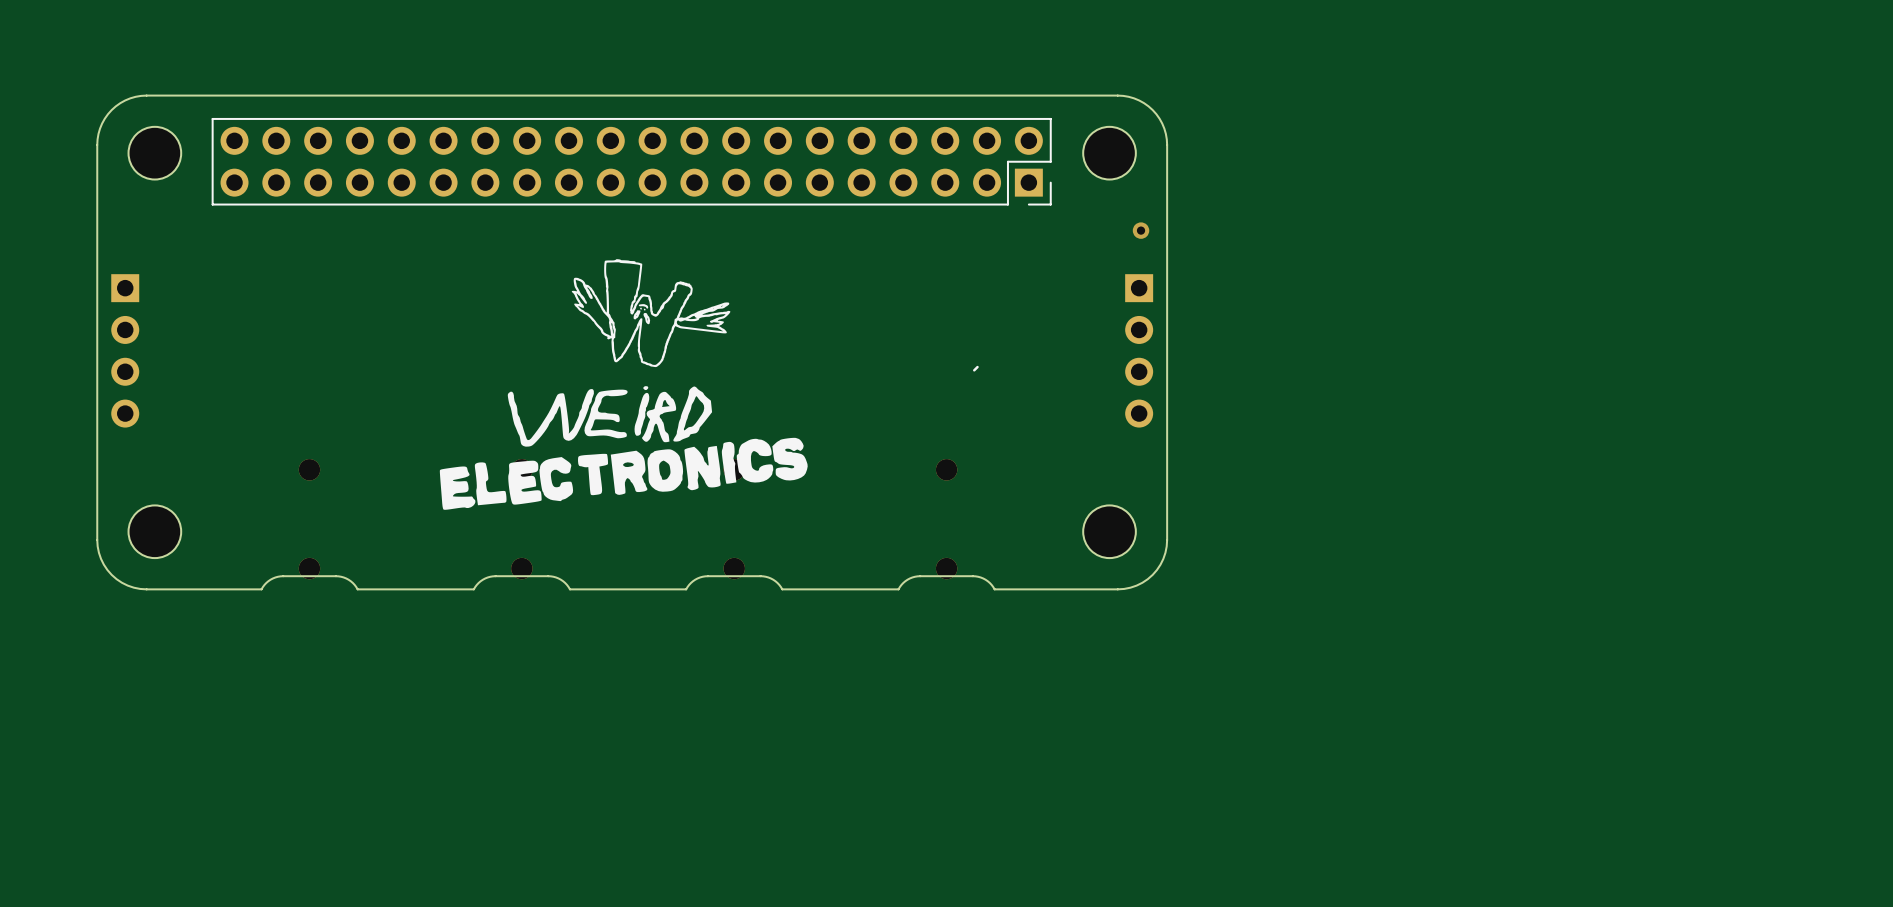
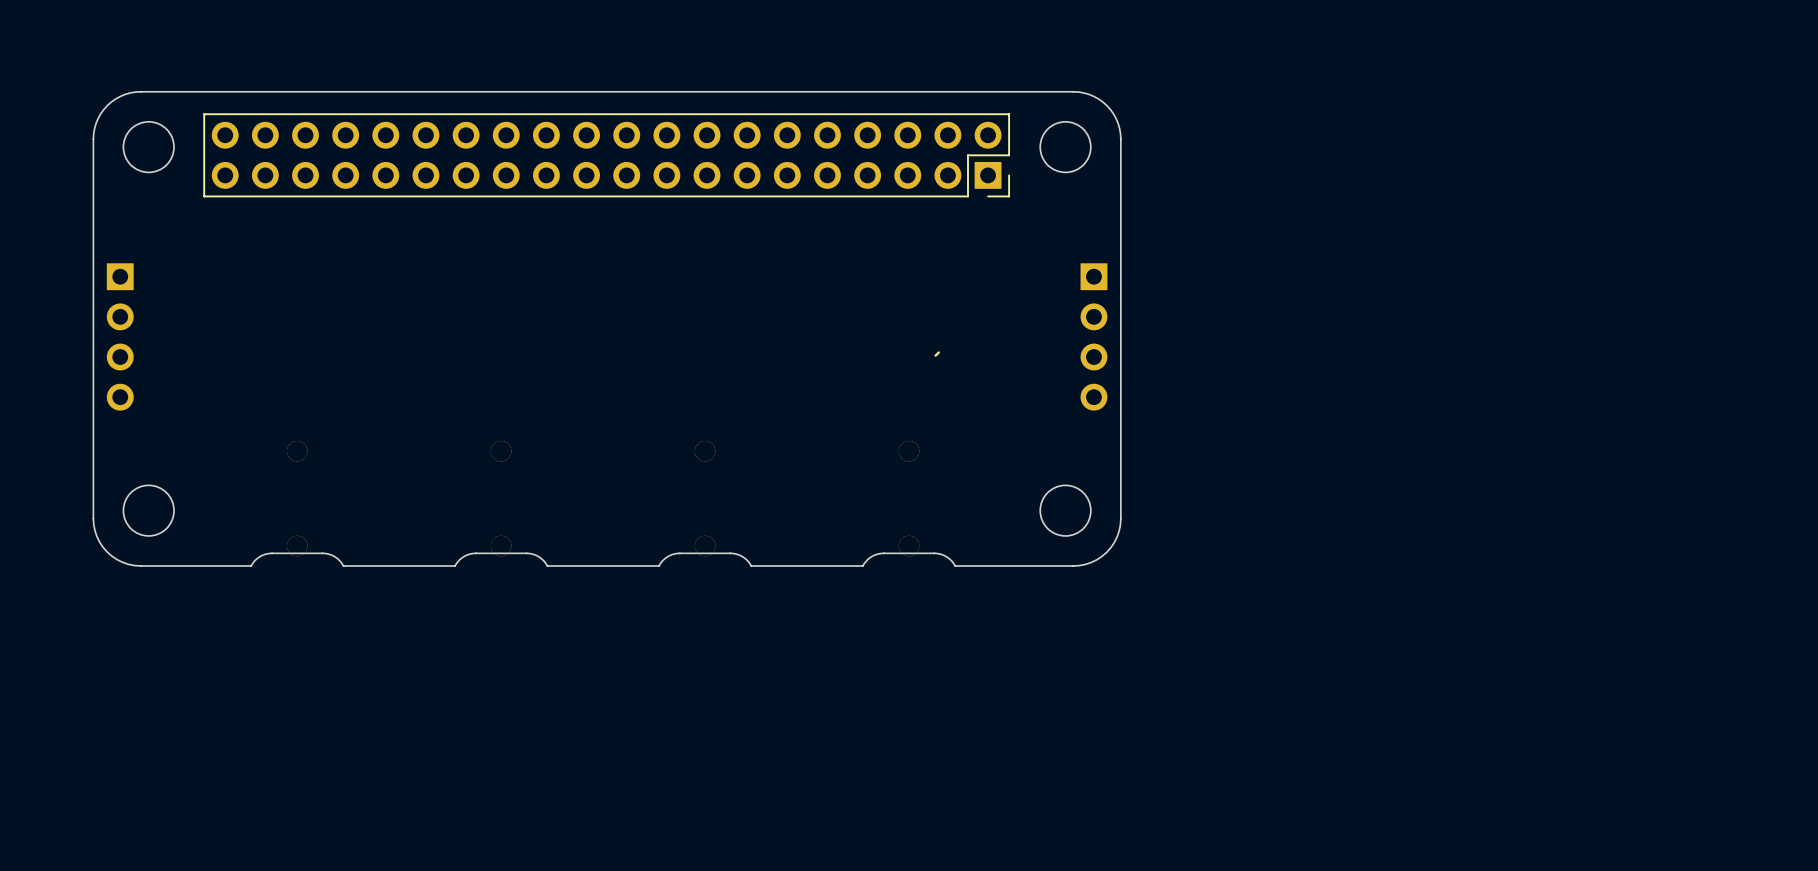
via: (1141, 230) -> none
drawing: [439, 259, 808, 510] -> none

